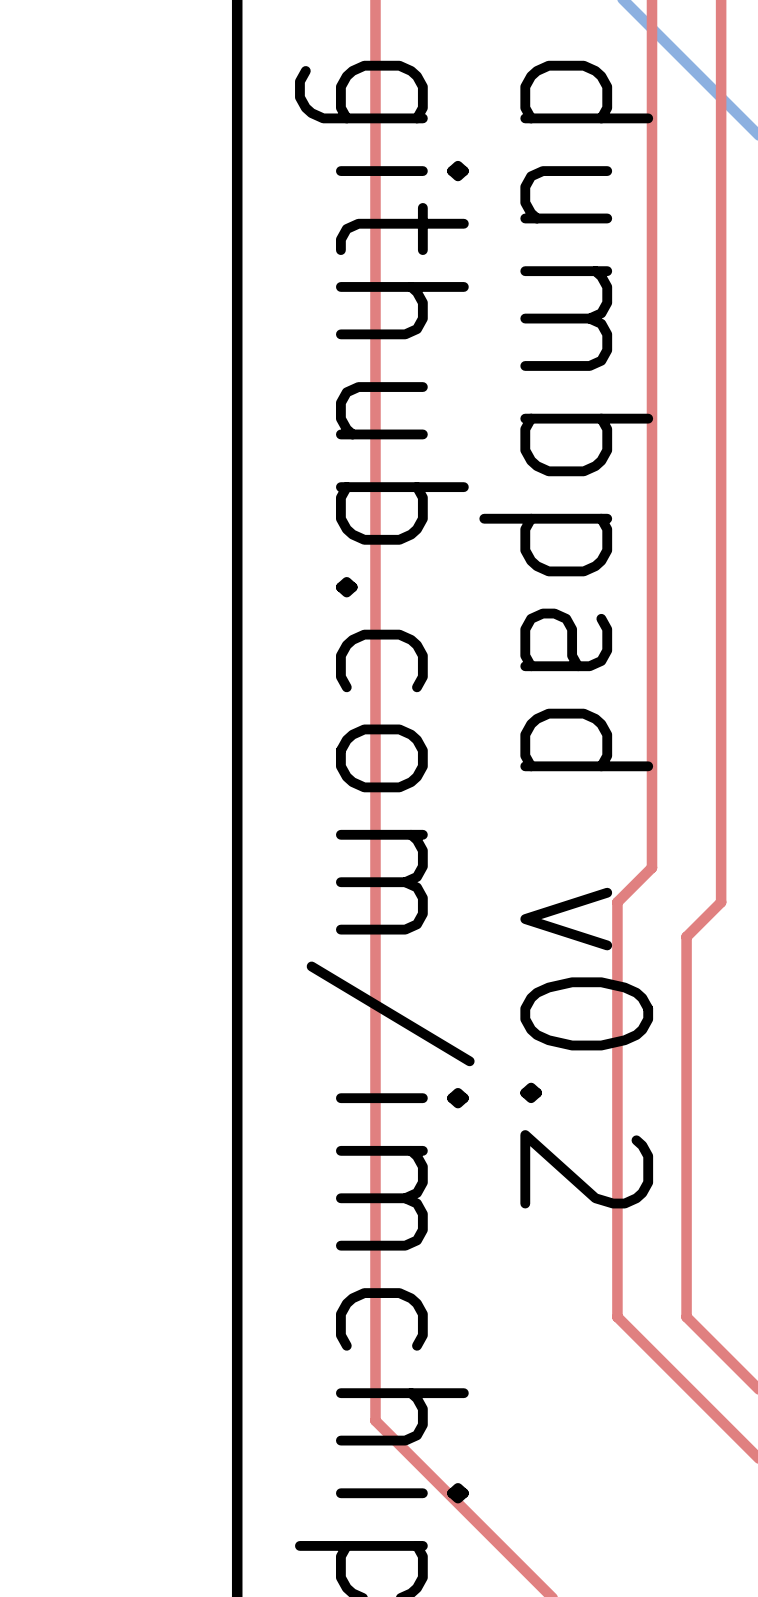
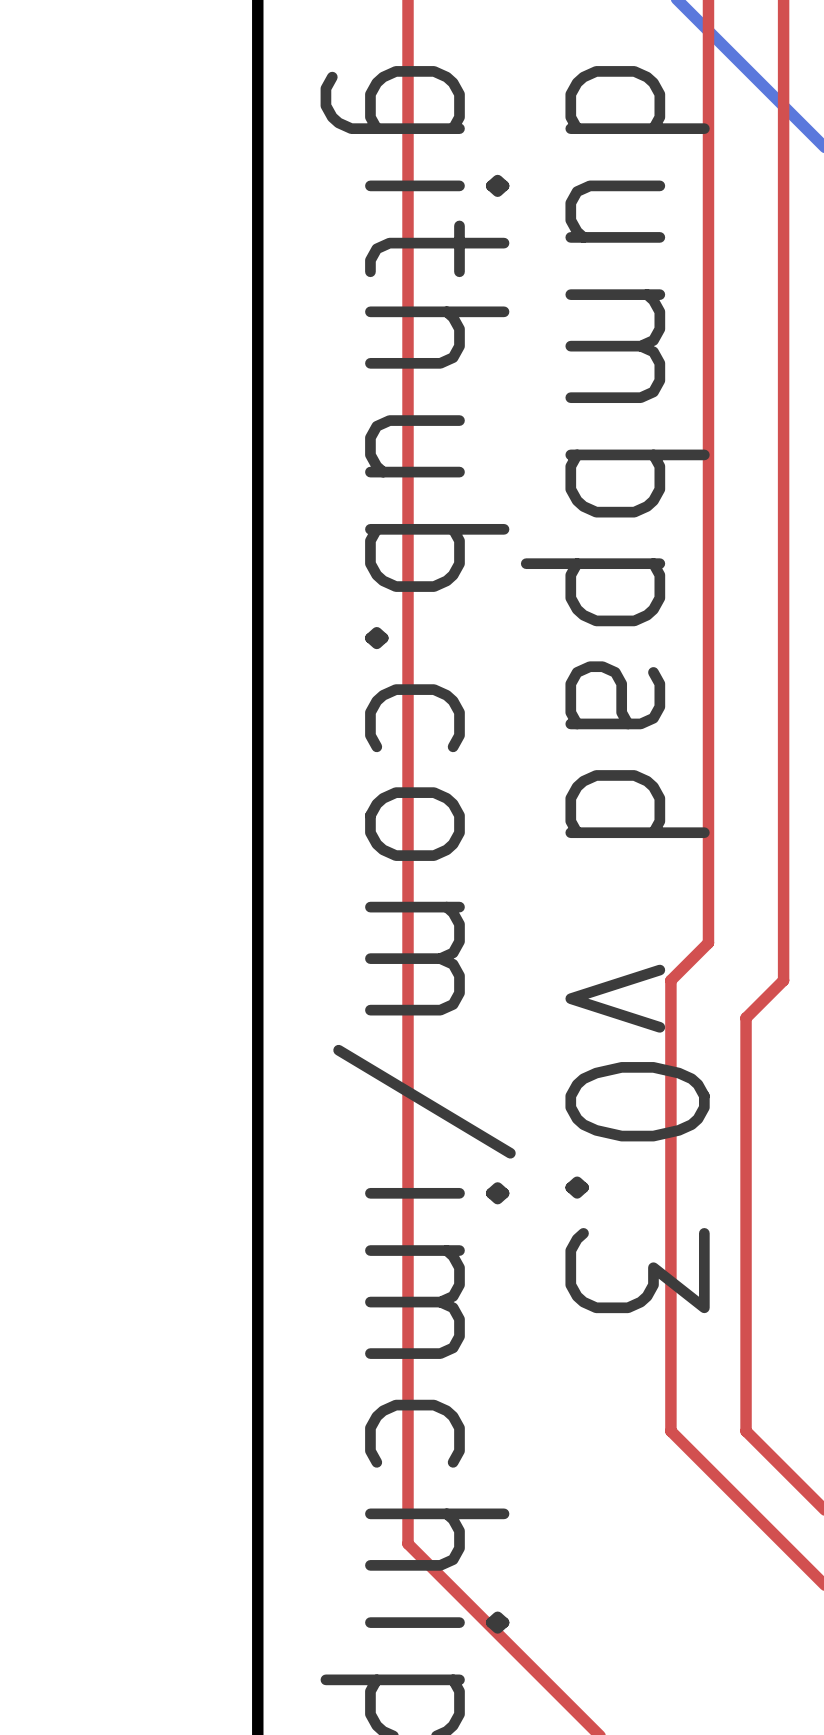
text: dumbpad v0.2 (566, 634) -> dumbpad v0.3 (615, 689)

